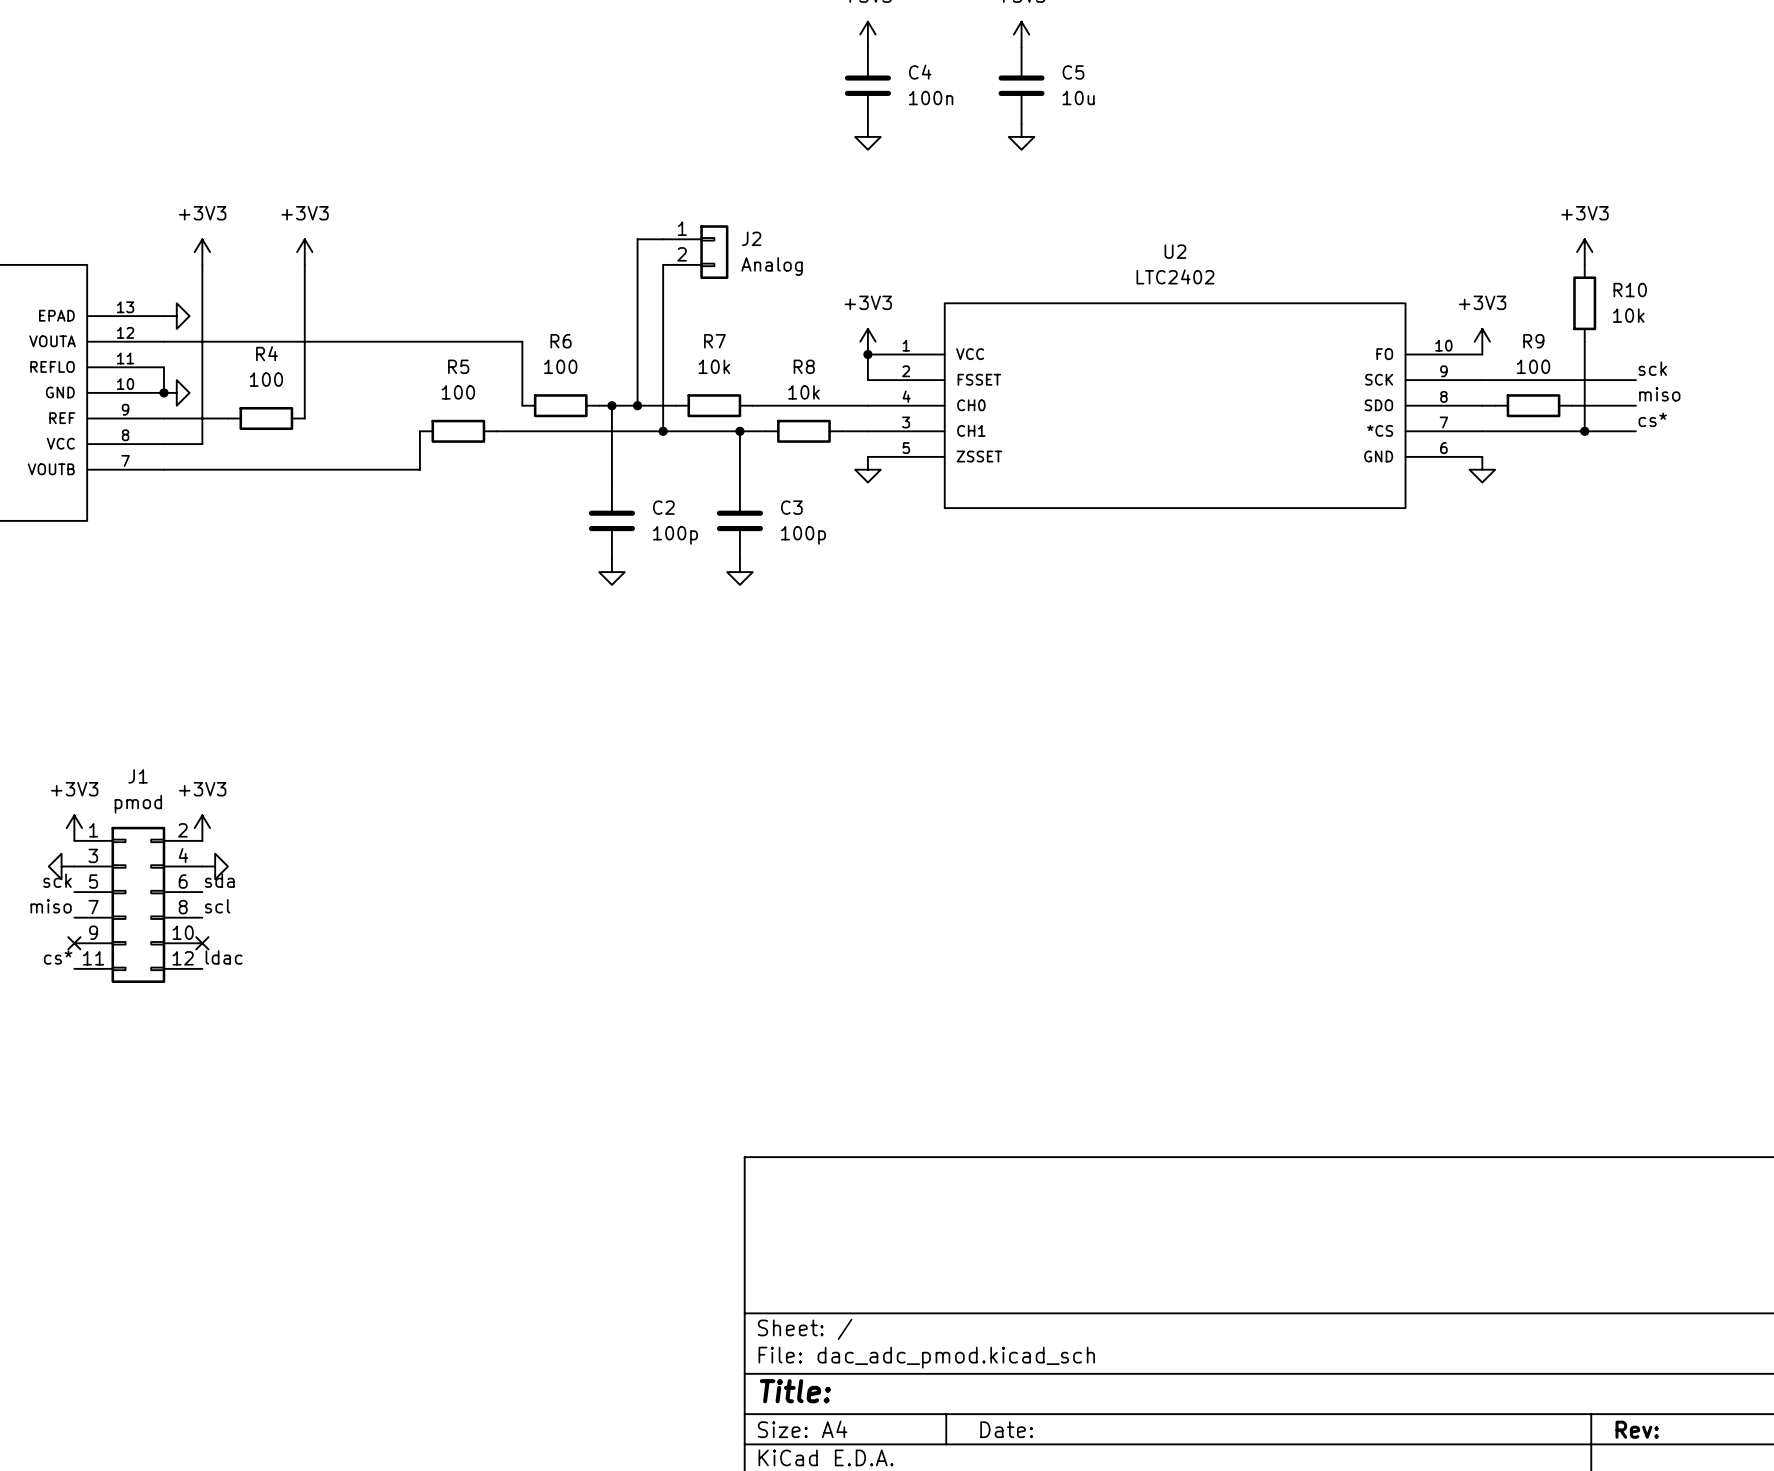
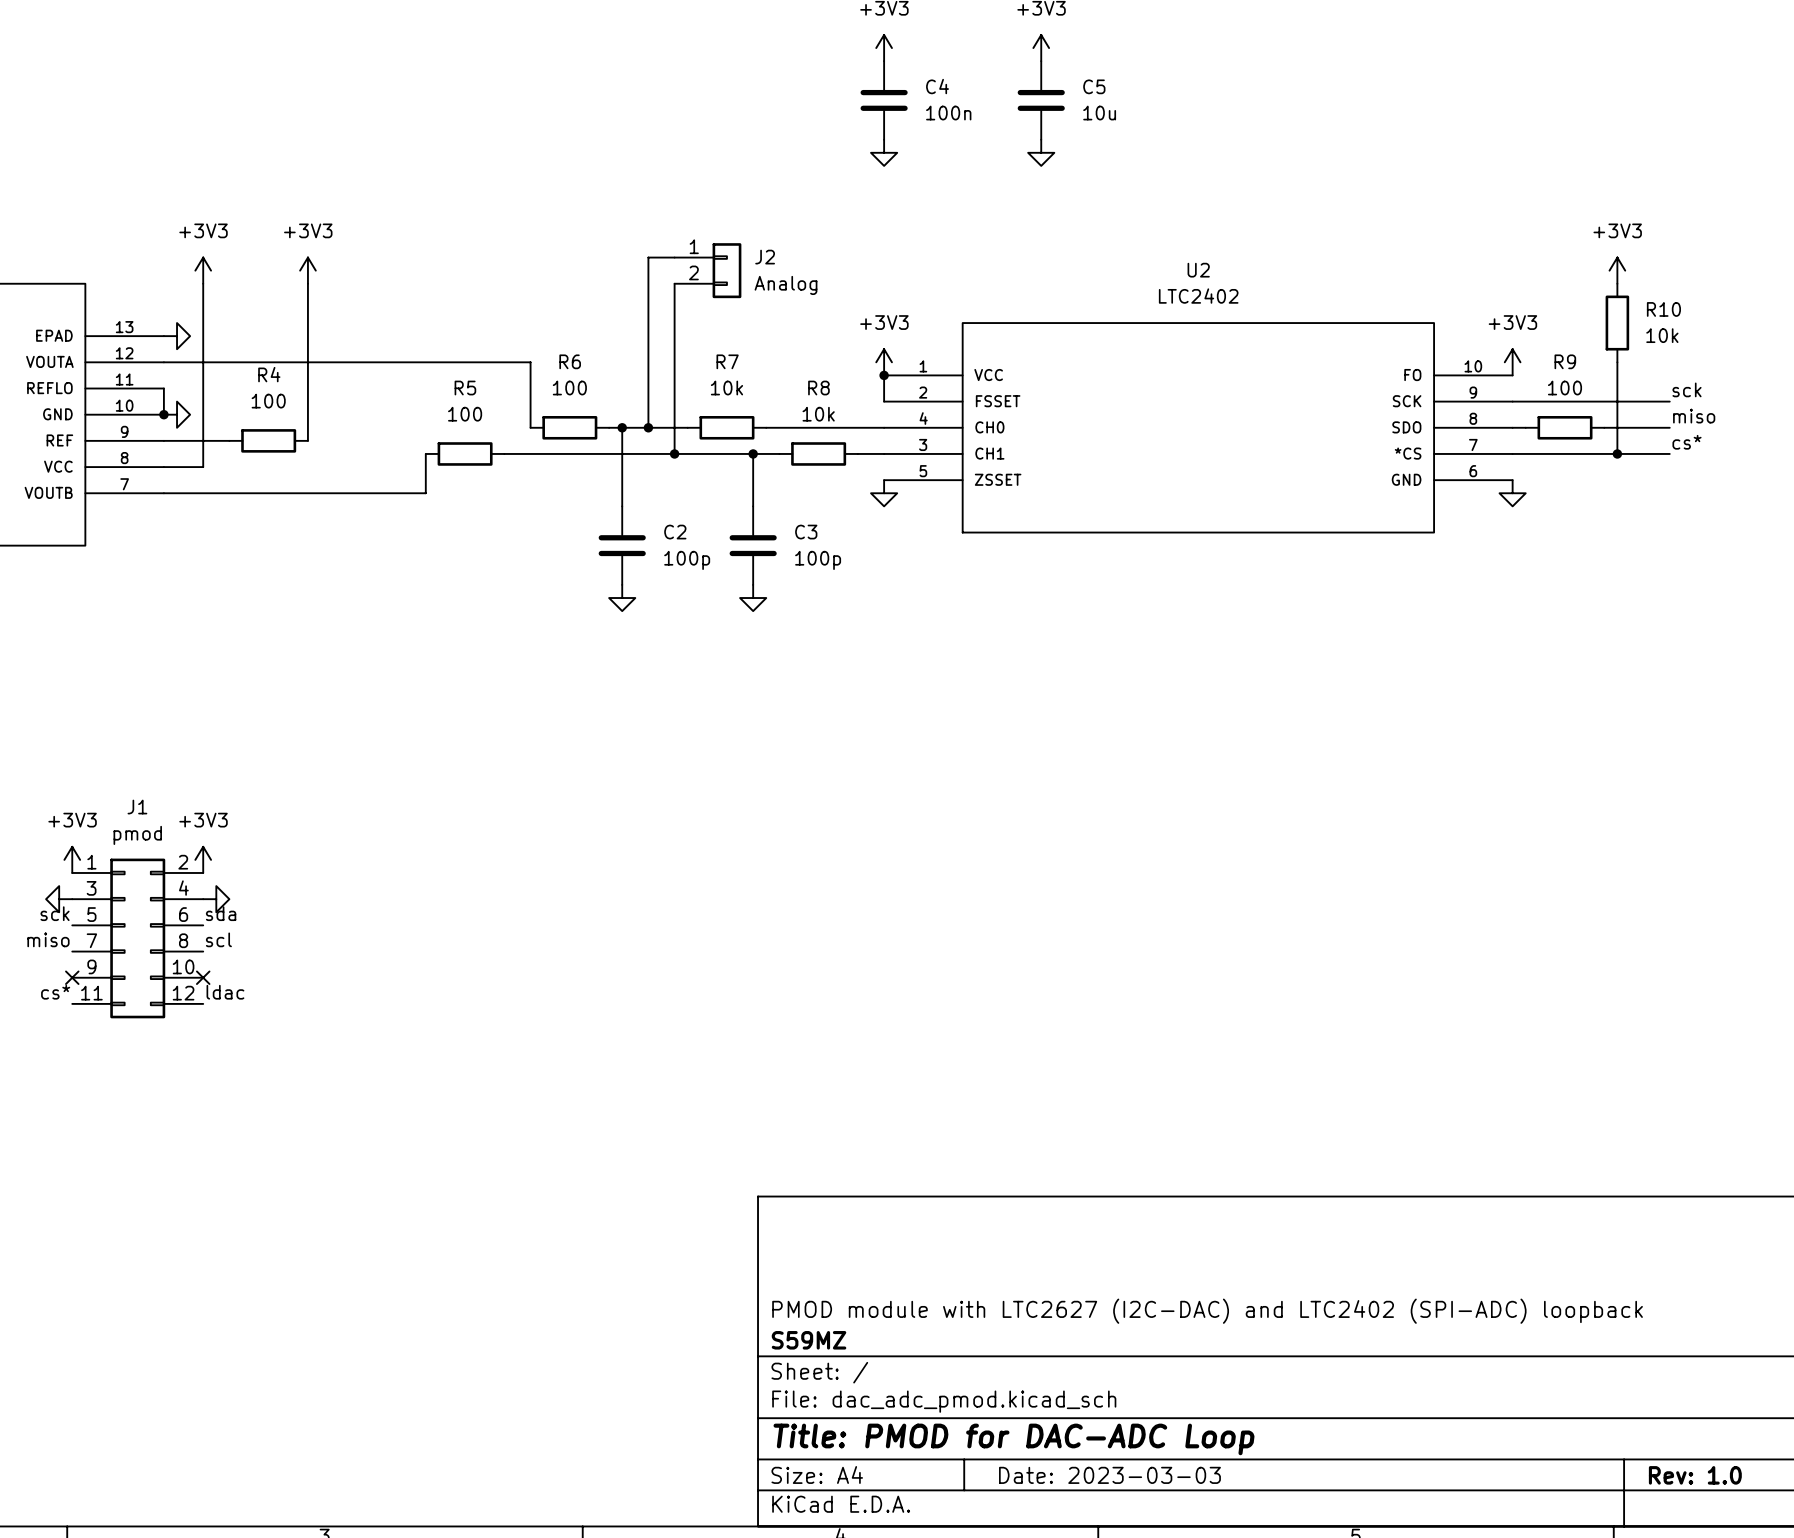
title block: none -> PMOD module with LTC2627 (I2C-DAC) and LTC2402 (SPI-ADC) loopback (1207, 1311)
title block: none -> S59MZ (809, 1340)
title block: Title: (795, 1391) -> Title: PMOD for DAC-ADC Loop (1014, 1439)
title block: Date: (1006, 1429) -> Date: 2023-03-03 (1109, 1475)
title block: Rev: (1637, 1429) -> Rev: 1.0 (1695, 1475)

